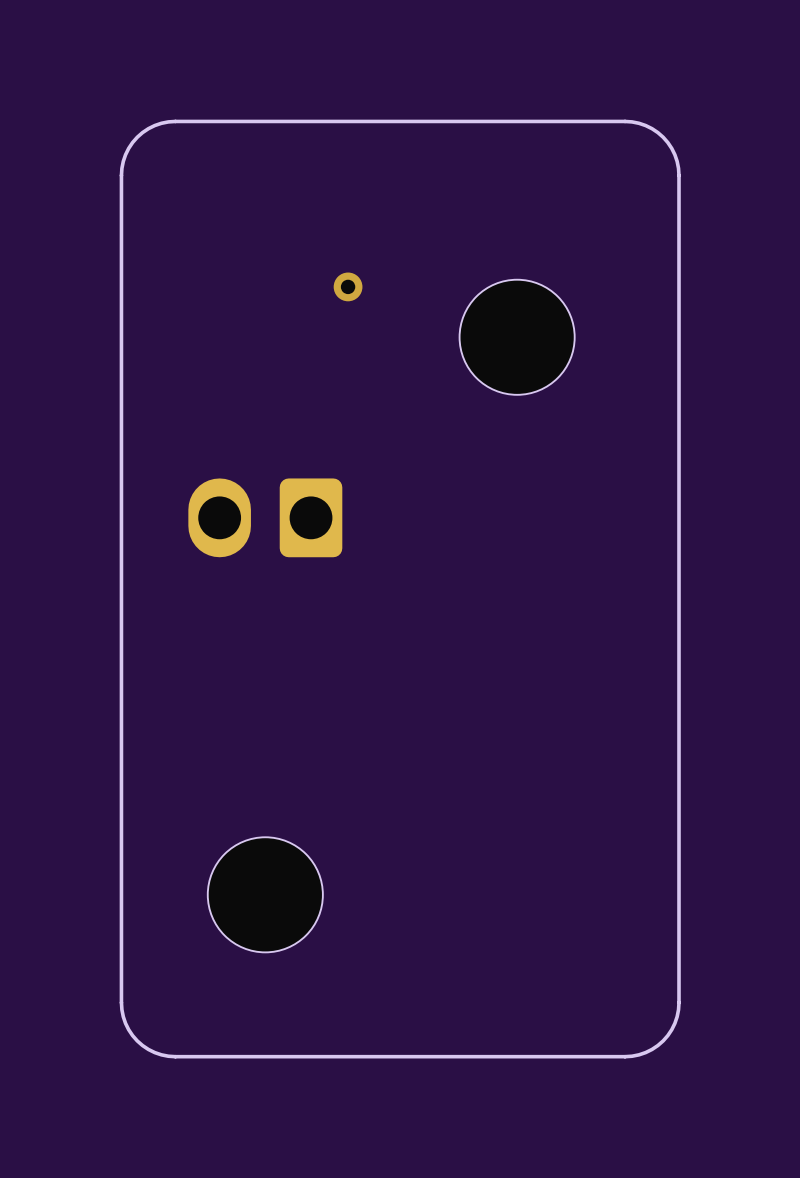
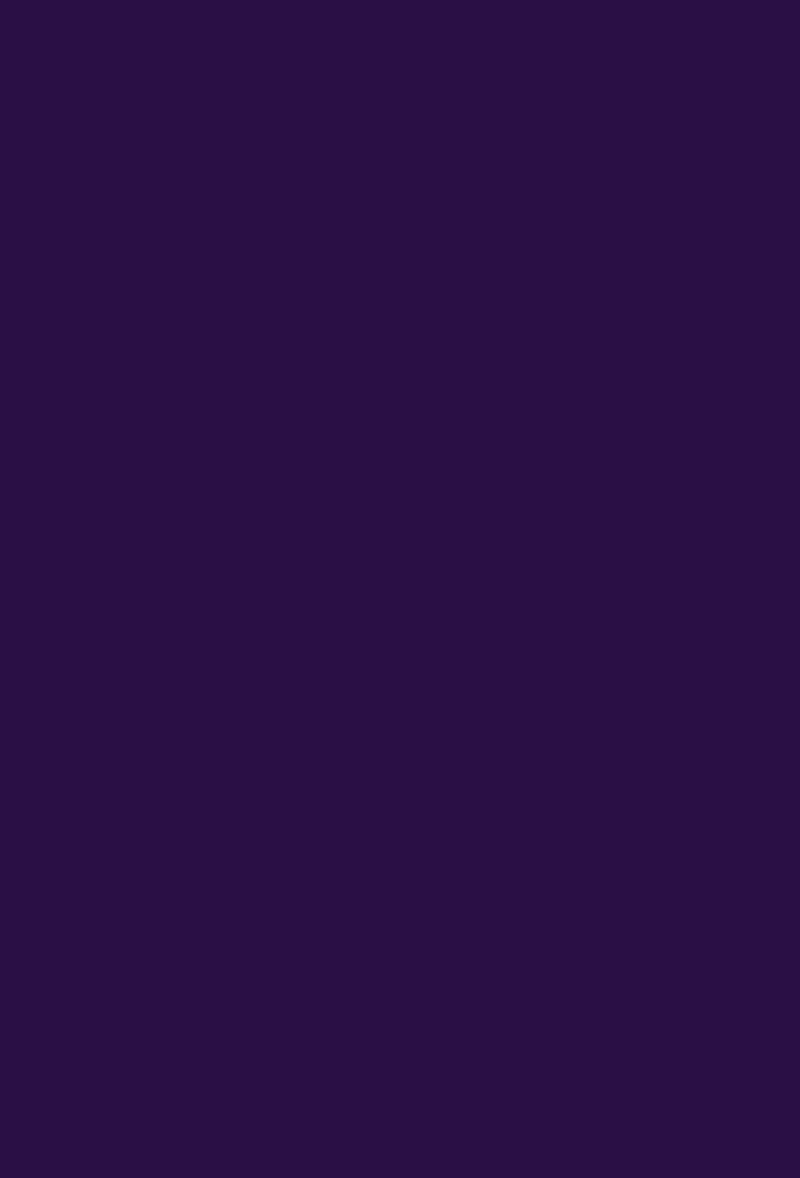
board edge: (625, 121) (175, 121) (161, 123) (148, 128) (137, 137) (128, 148) (123, 161) (121, 175) (121, 1002) (123, 1016) (128, 1029) (137, 1040) (148, 1049) (161, 1054) (175, 1056) (625, 1056) (639, 1054) (652, 1049) (663, 1040) (671, 1029) (677, 1016) (678, 1002) (678, 175) (674, 154) (663, 137) (645, 125) (625, 121) -> none
via: (348, 286) -> none
part: (517, 337) -> none
part: (265, 517) -> none
part: (265, 894) -> none

